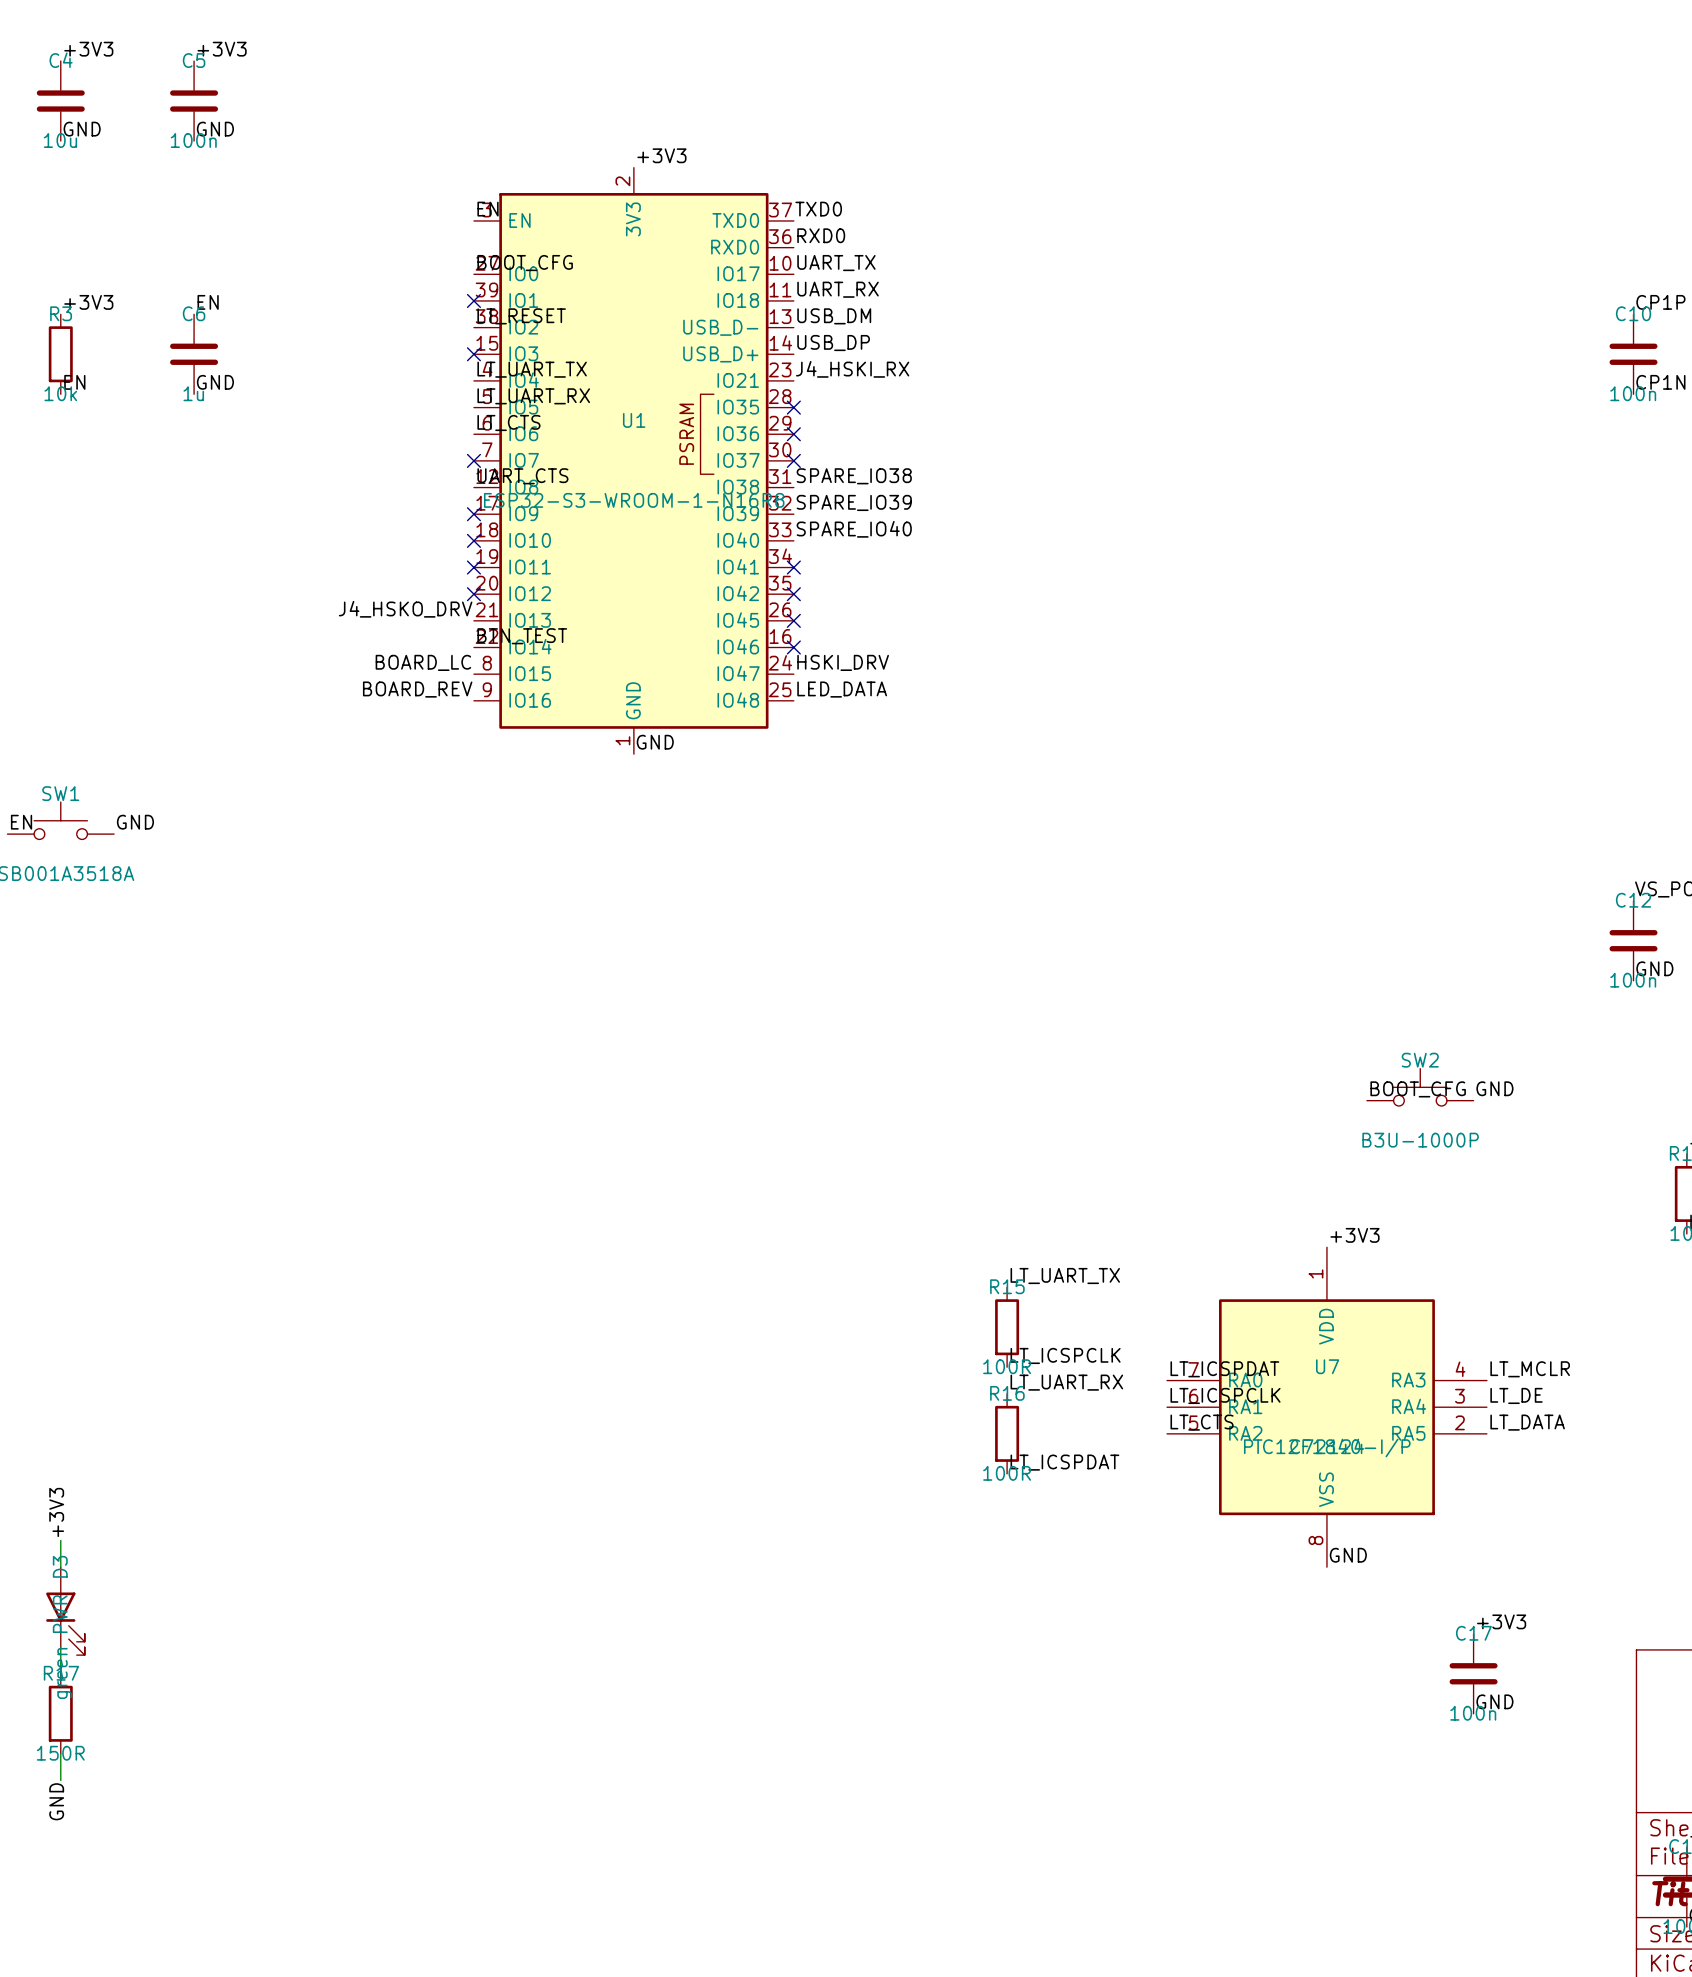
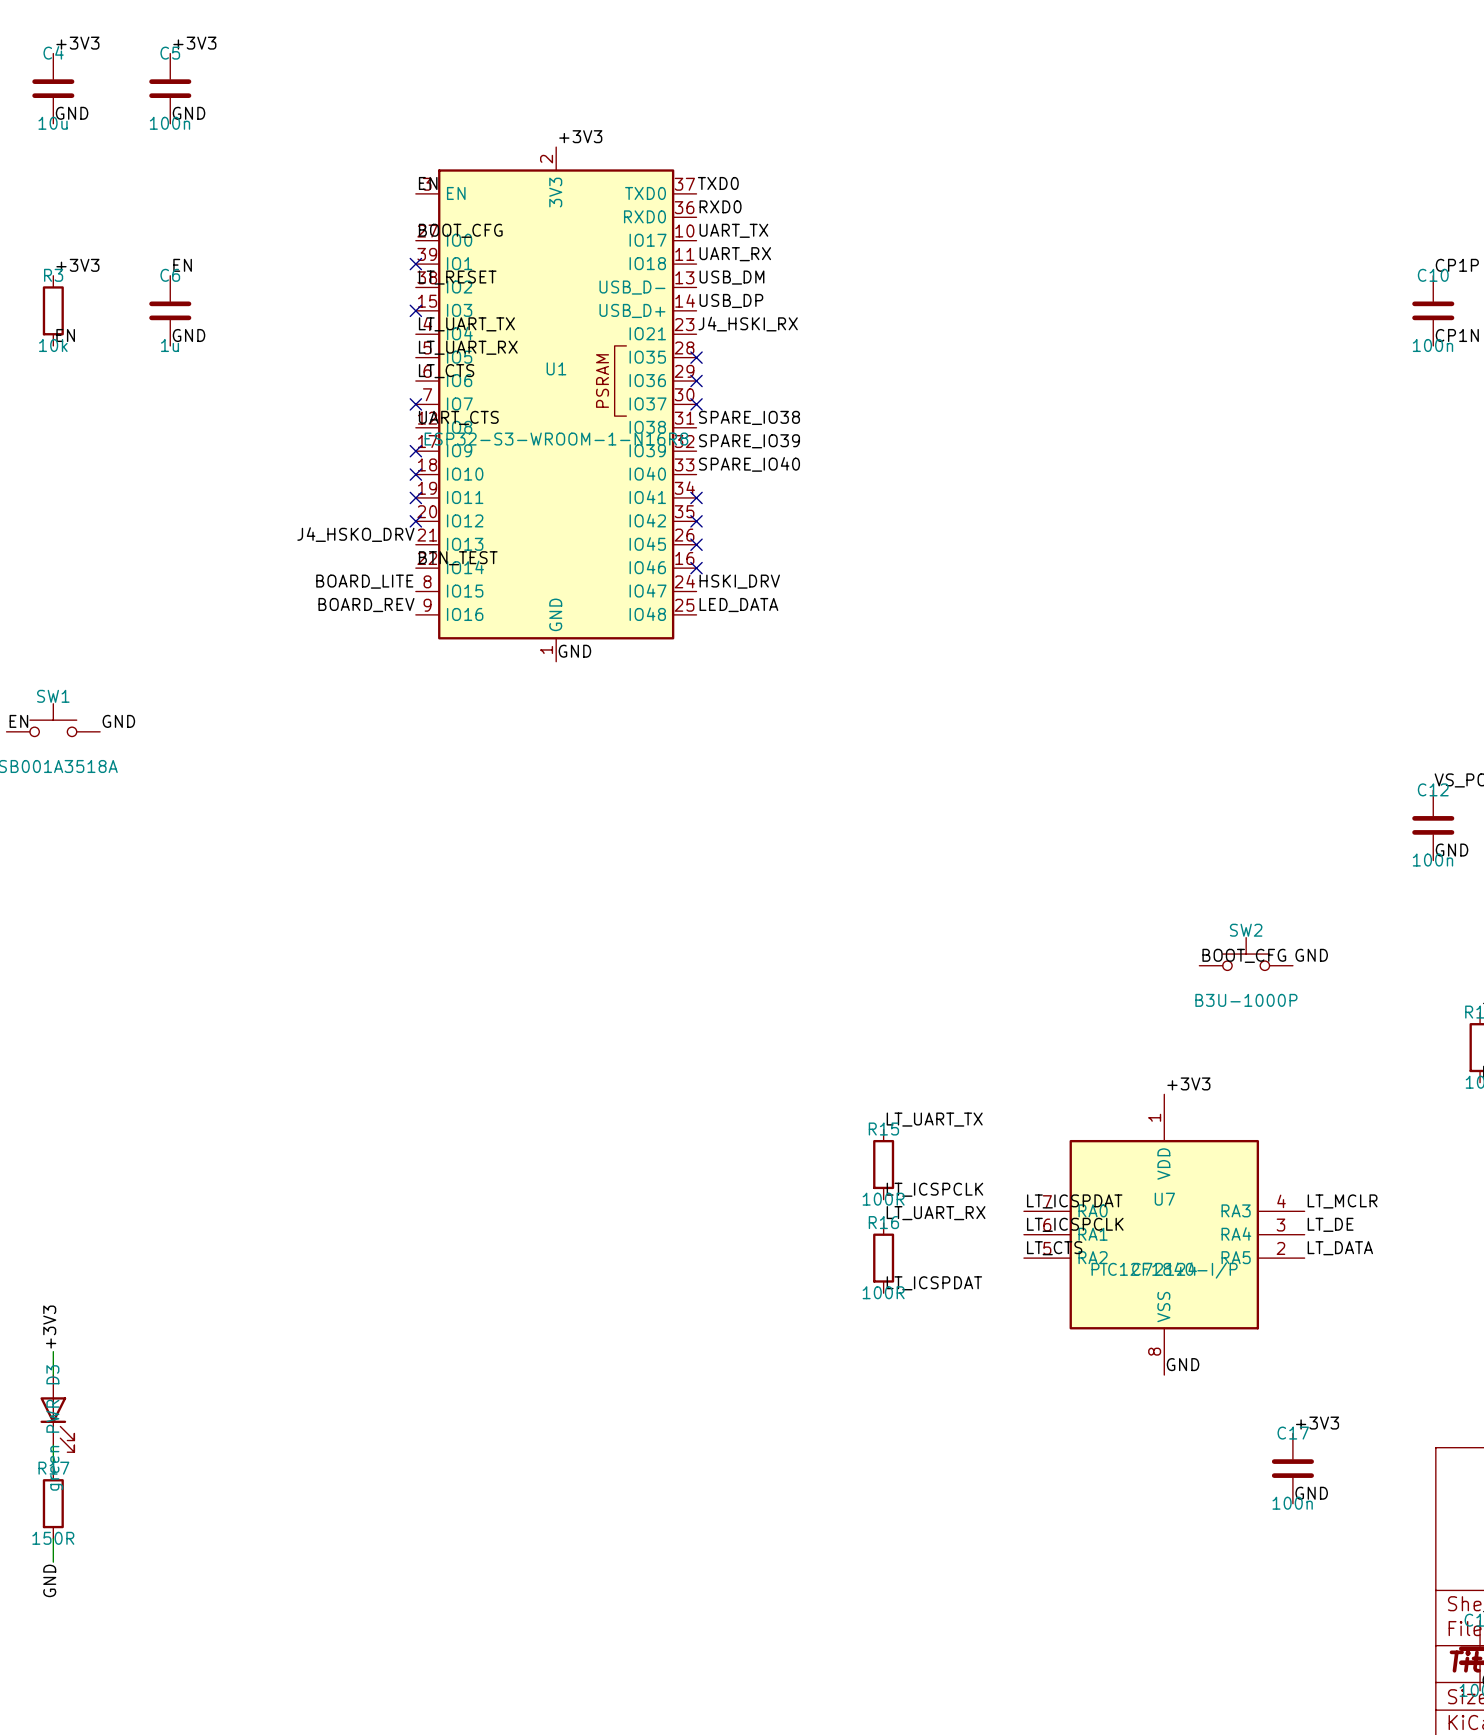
label: BOARD_LC (423, 662) -> BOARD_LITE (364, 581)

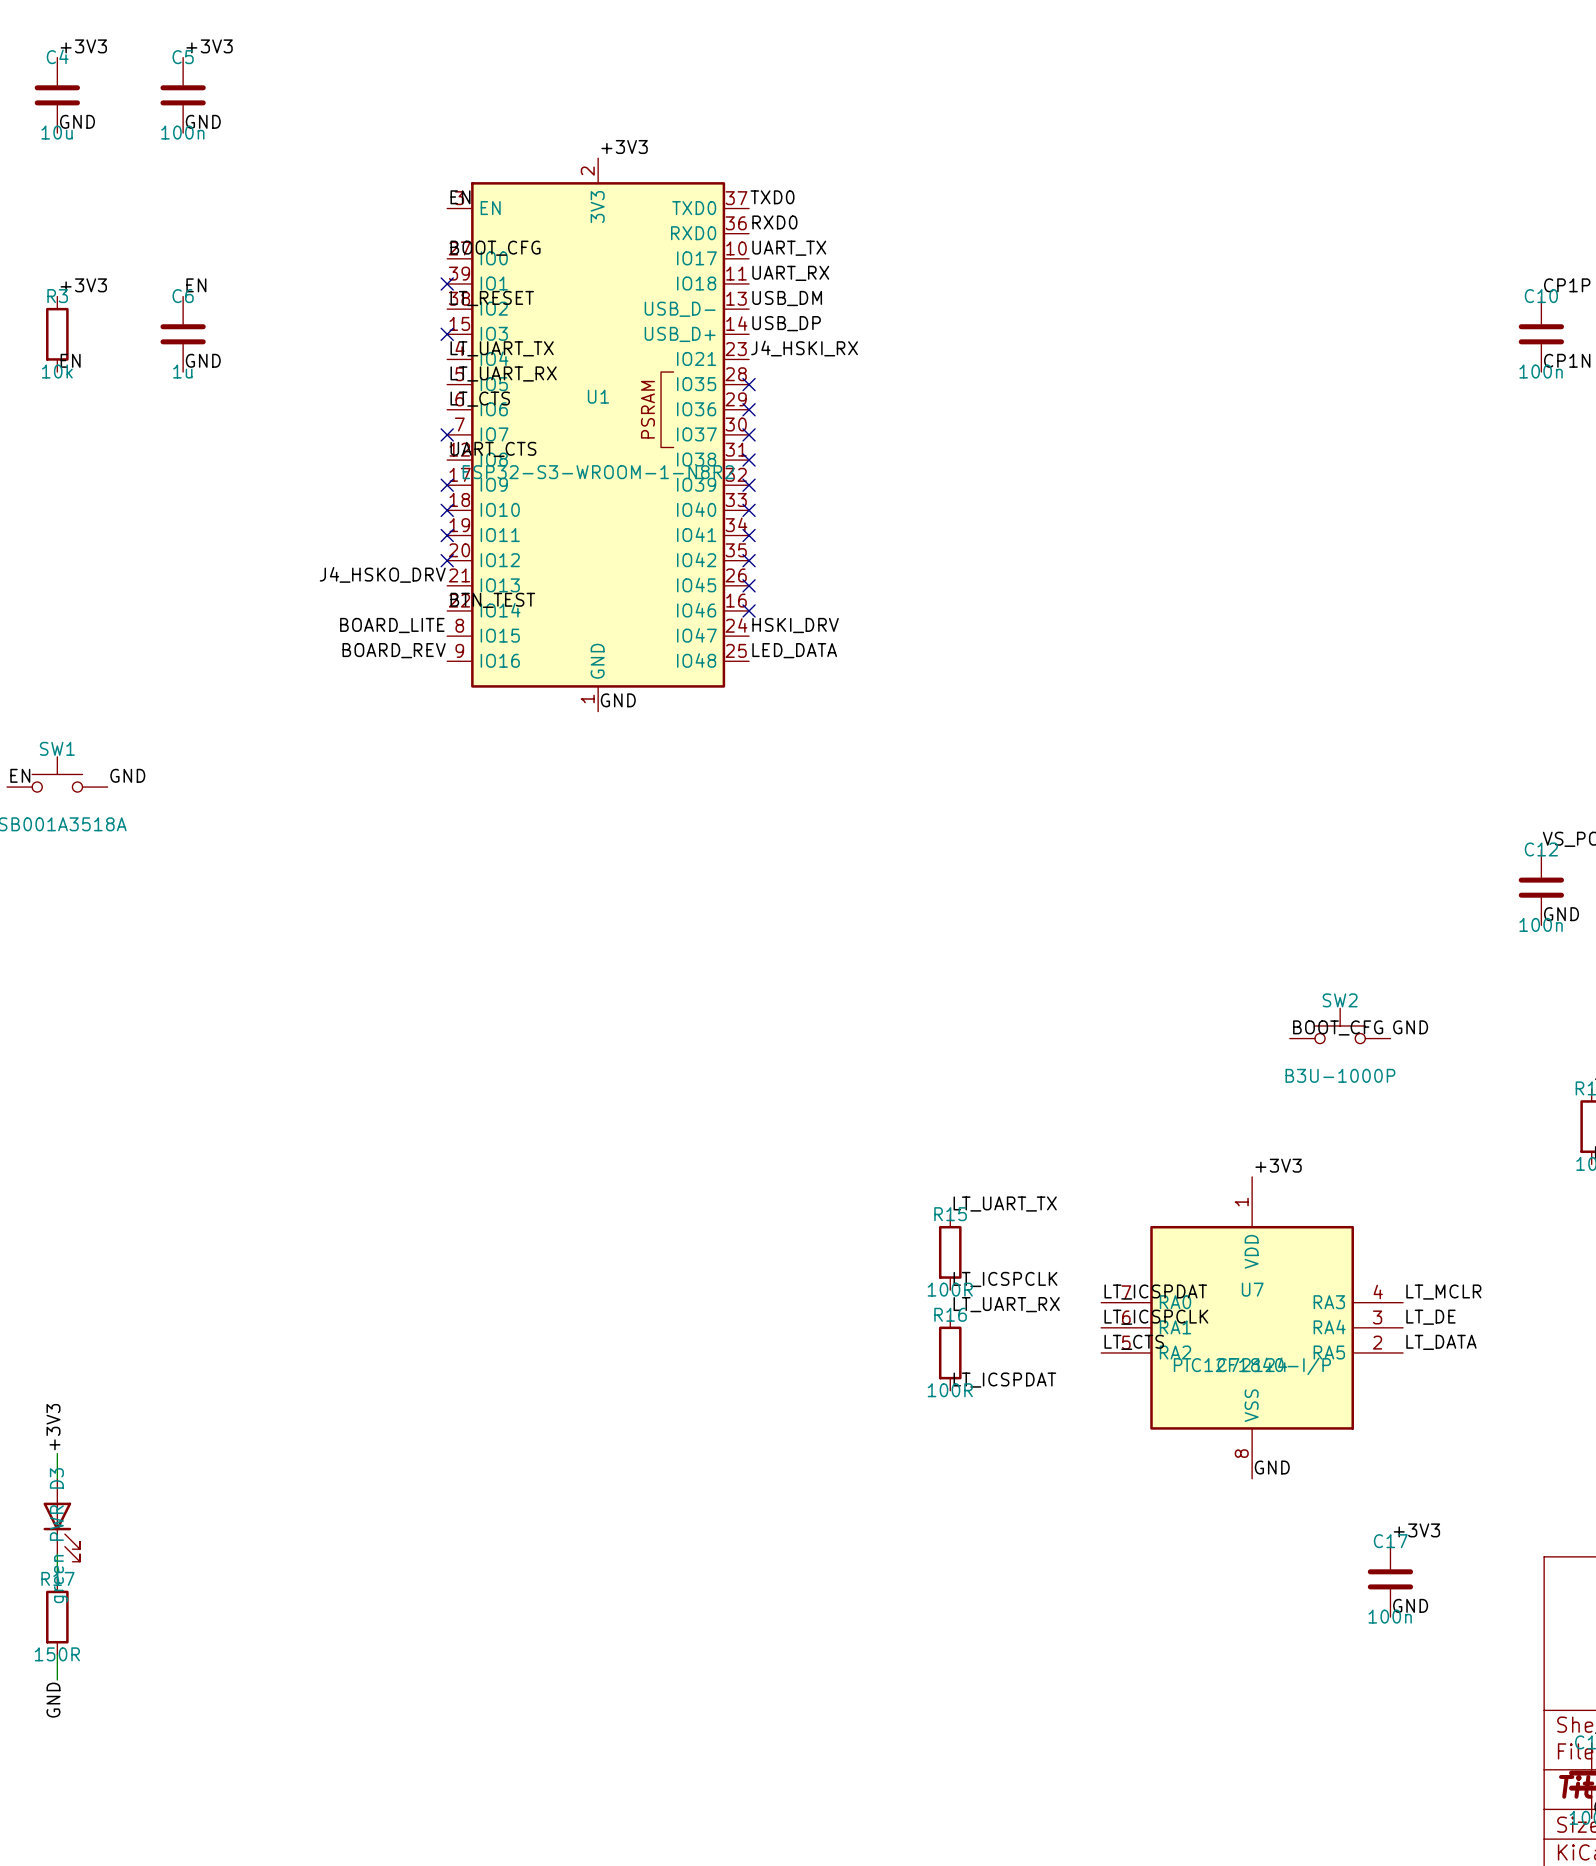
label: SPARE_IO38 (749, 417) -> none
no-connect mark: none -> (749, 460)
U1 value: ESP32-S3-WROOM-1-N16R8 (556, 439) -> ESP32-S3-WROOM-1-N8R2 (598, 472)
label: SPARE_IO39 (749, 441) -> none
no-connect mark: none -> (749, 485)
label: SPARE_IO40 (749, 464) -> none
no-connect mark: none -> (749, 510)

